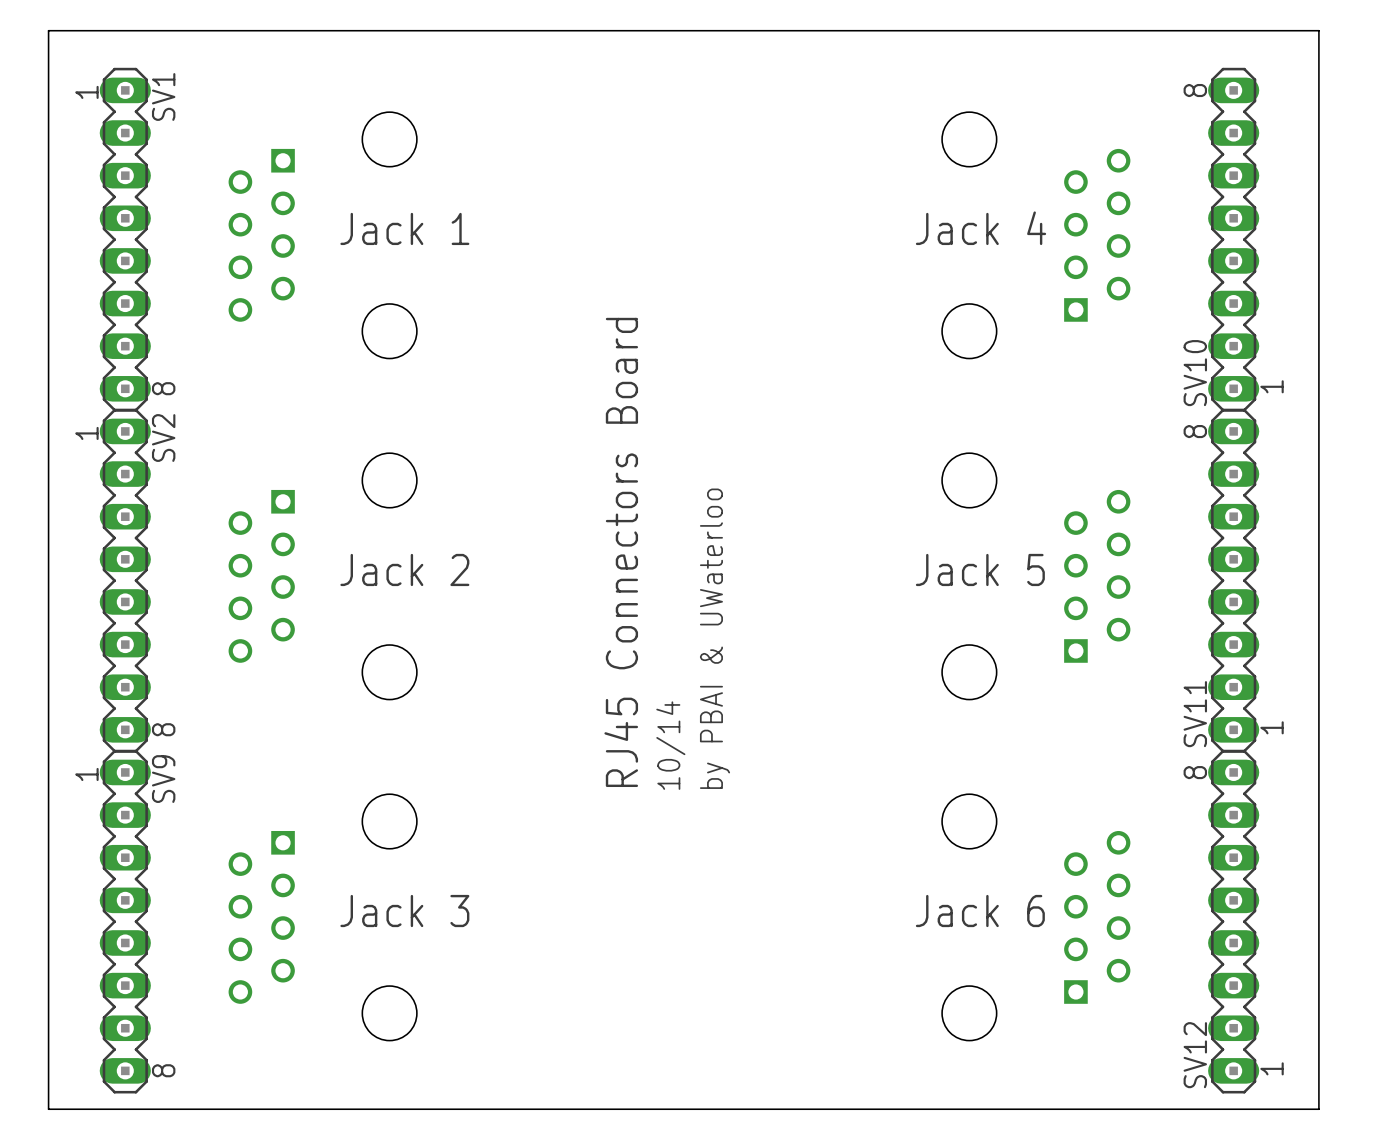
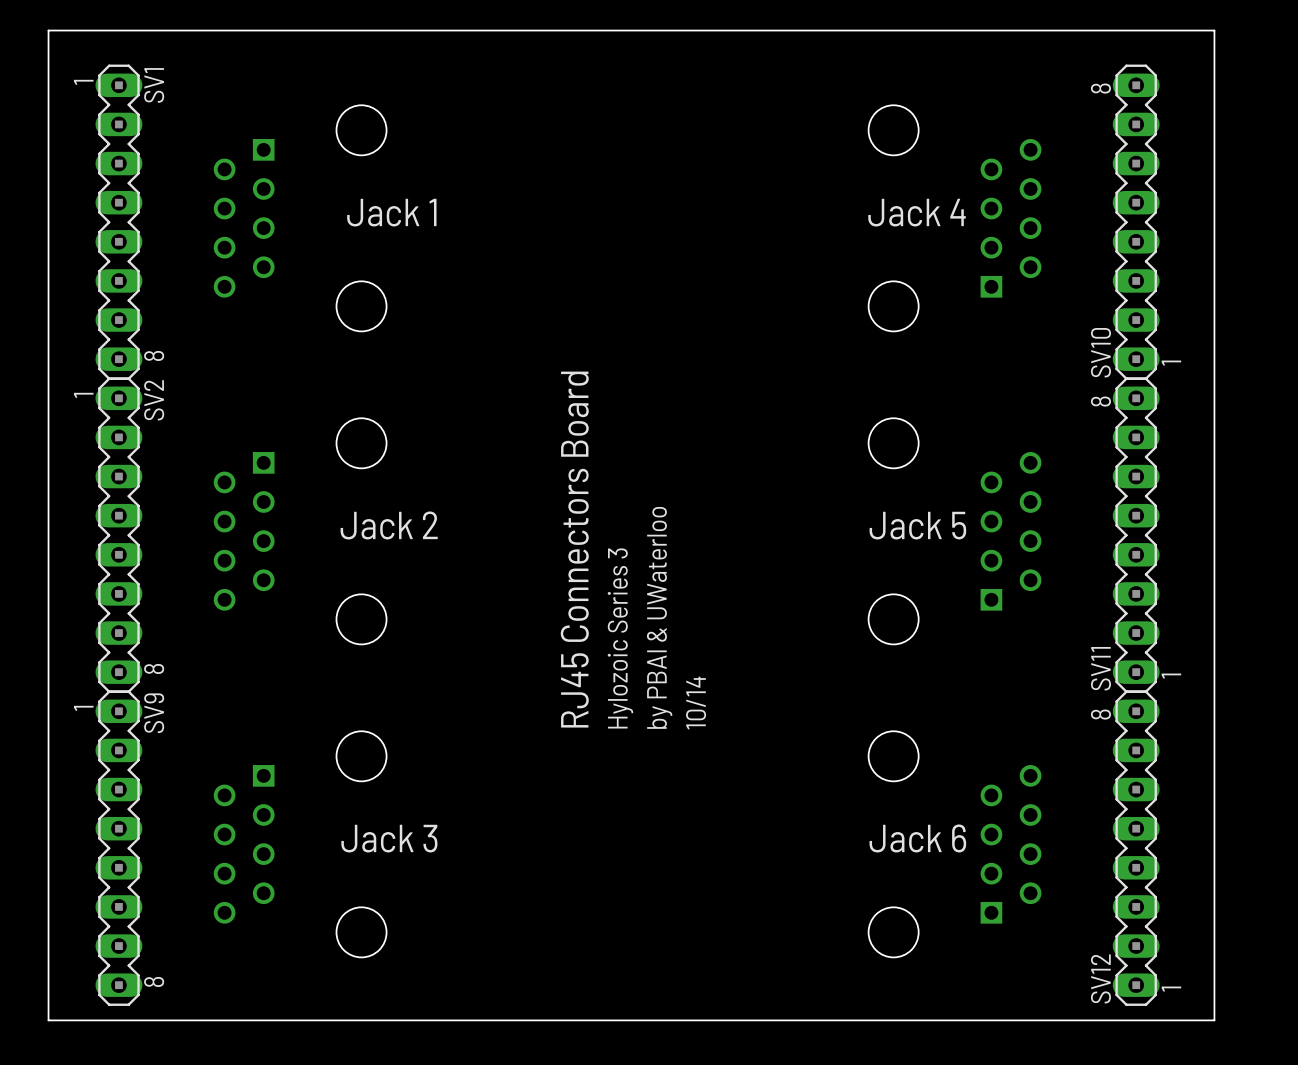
text: 10/14 (670, 745) -> Hylozoic Series 3 (620, 638)
text: none -> 10/14 (696, 703)

